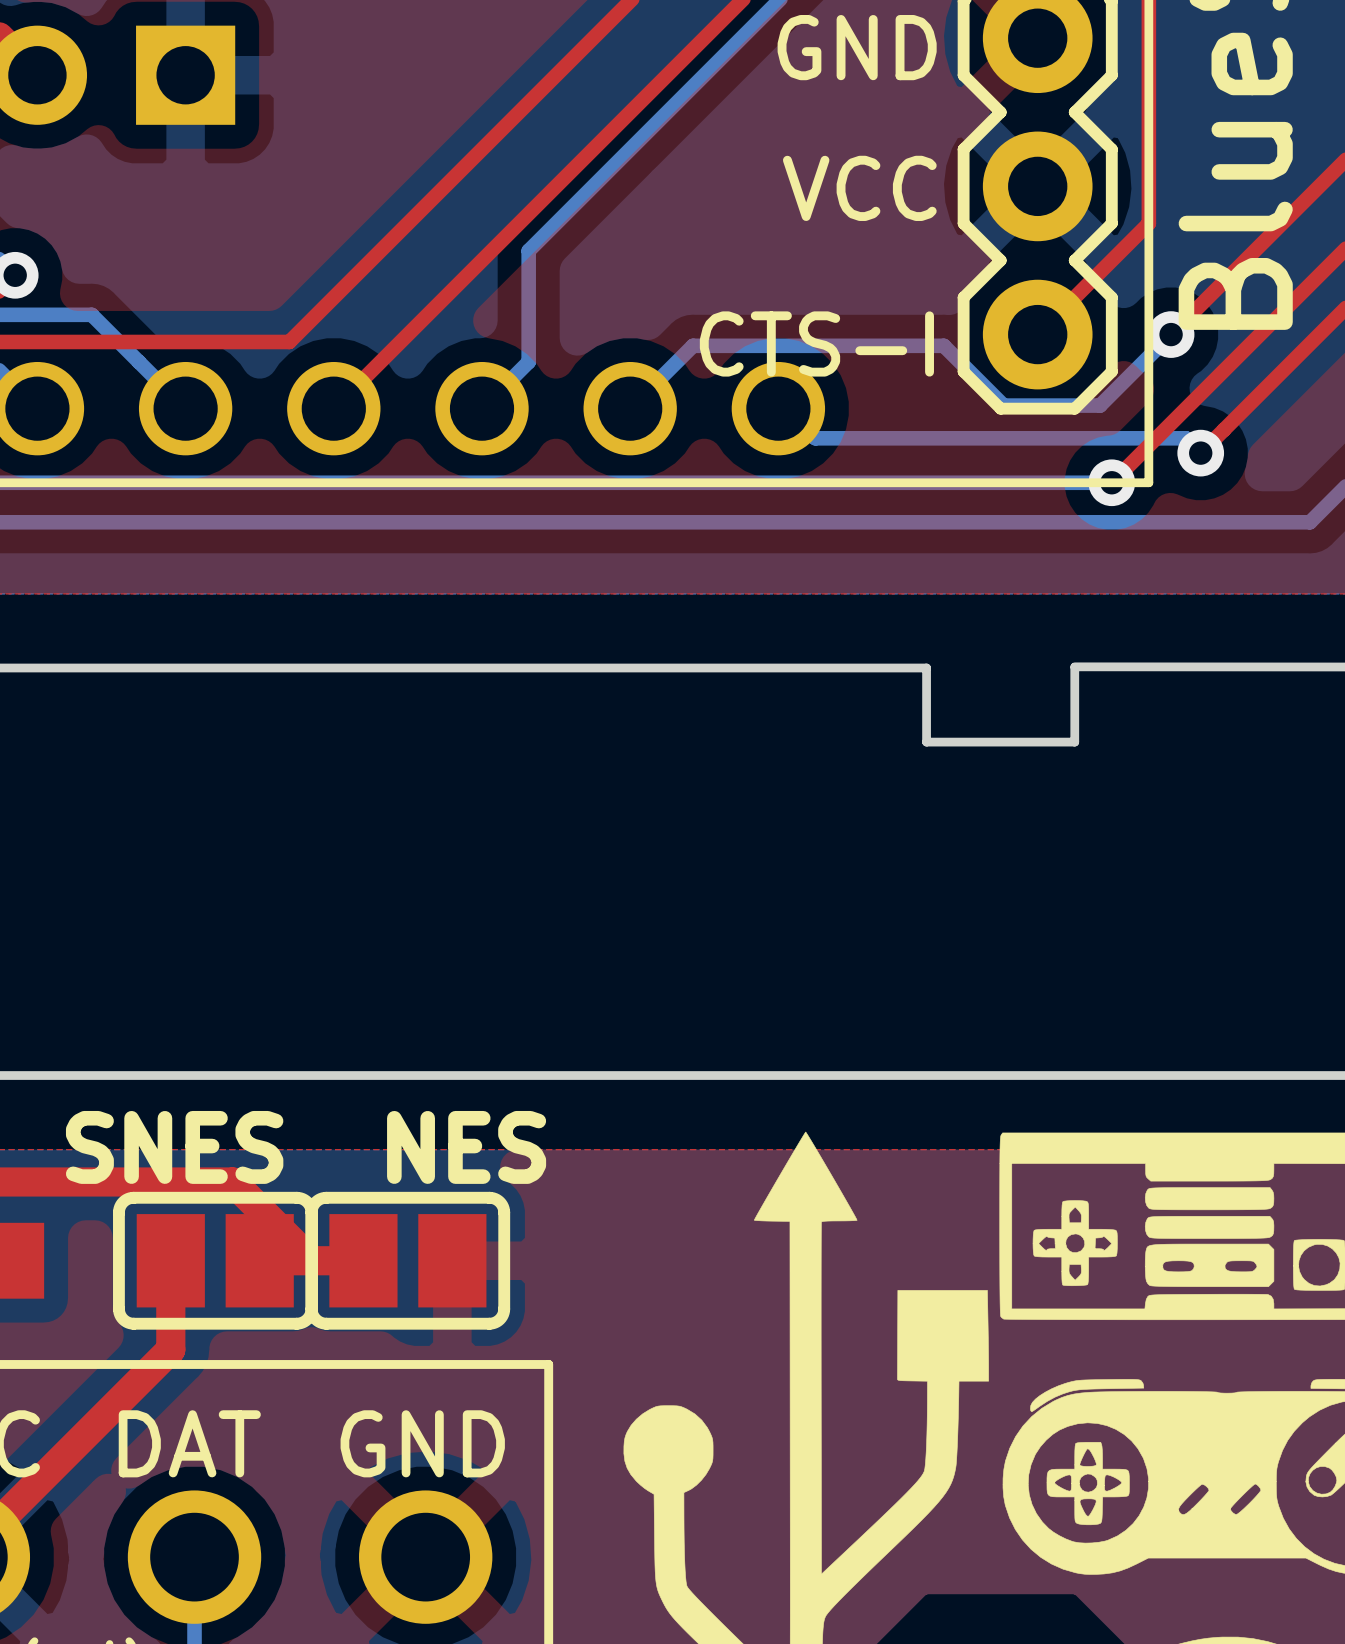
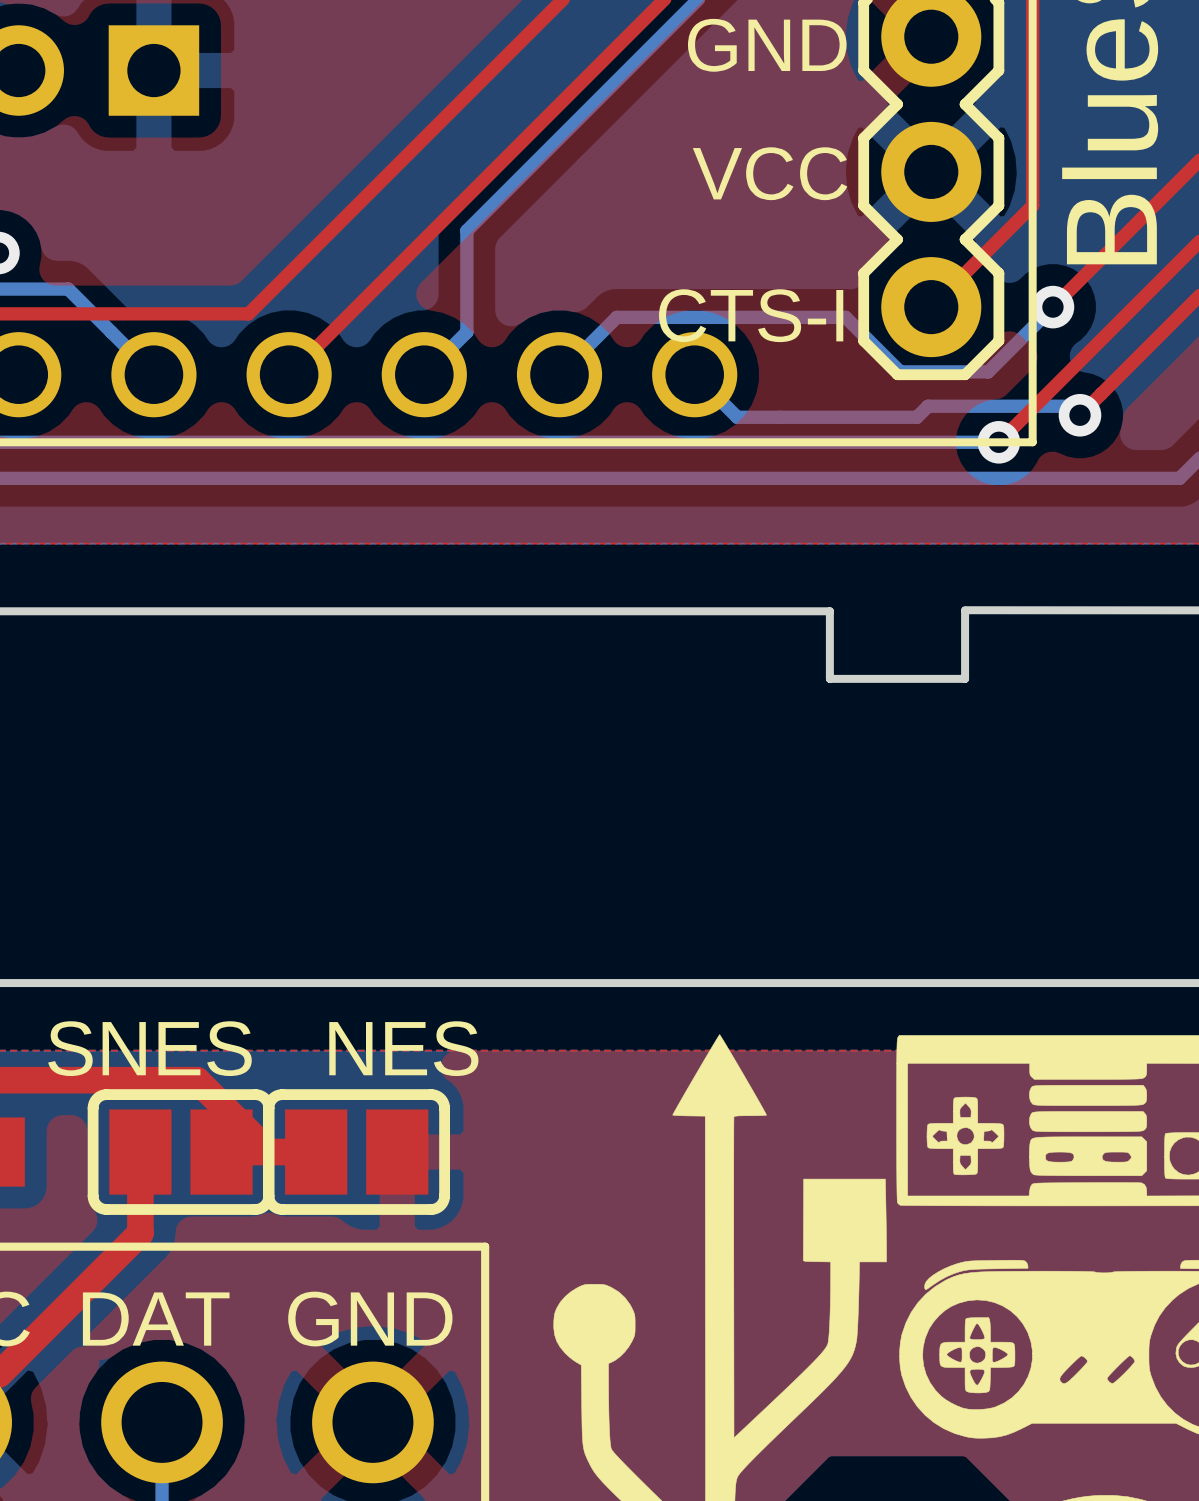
bottom track: (778, 408) (785, 408) (815, 438) (1185, 438) (1190, 443) -> (694, 374) (737, 417) (916, 417) (928, 406) (1070, 406)

